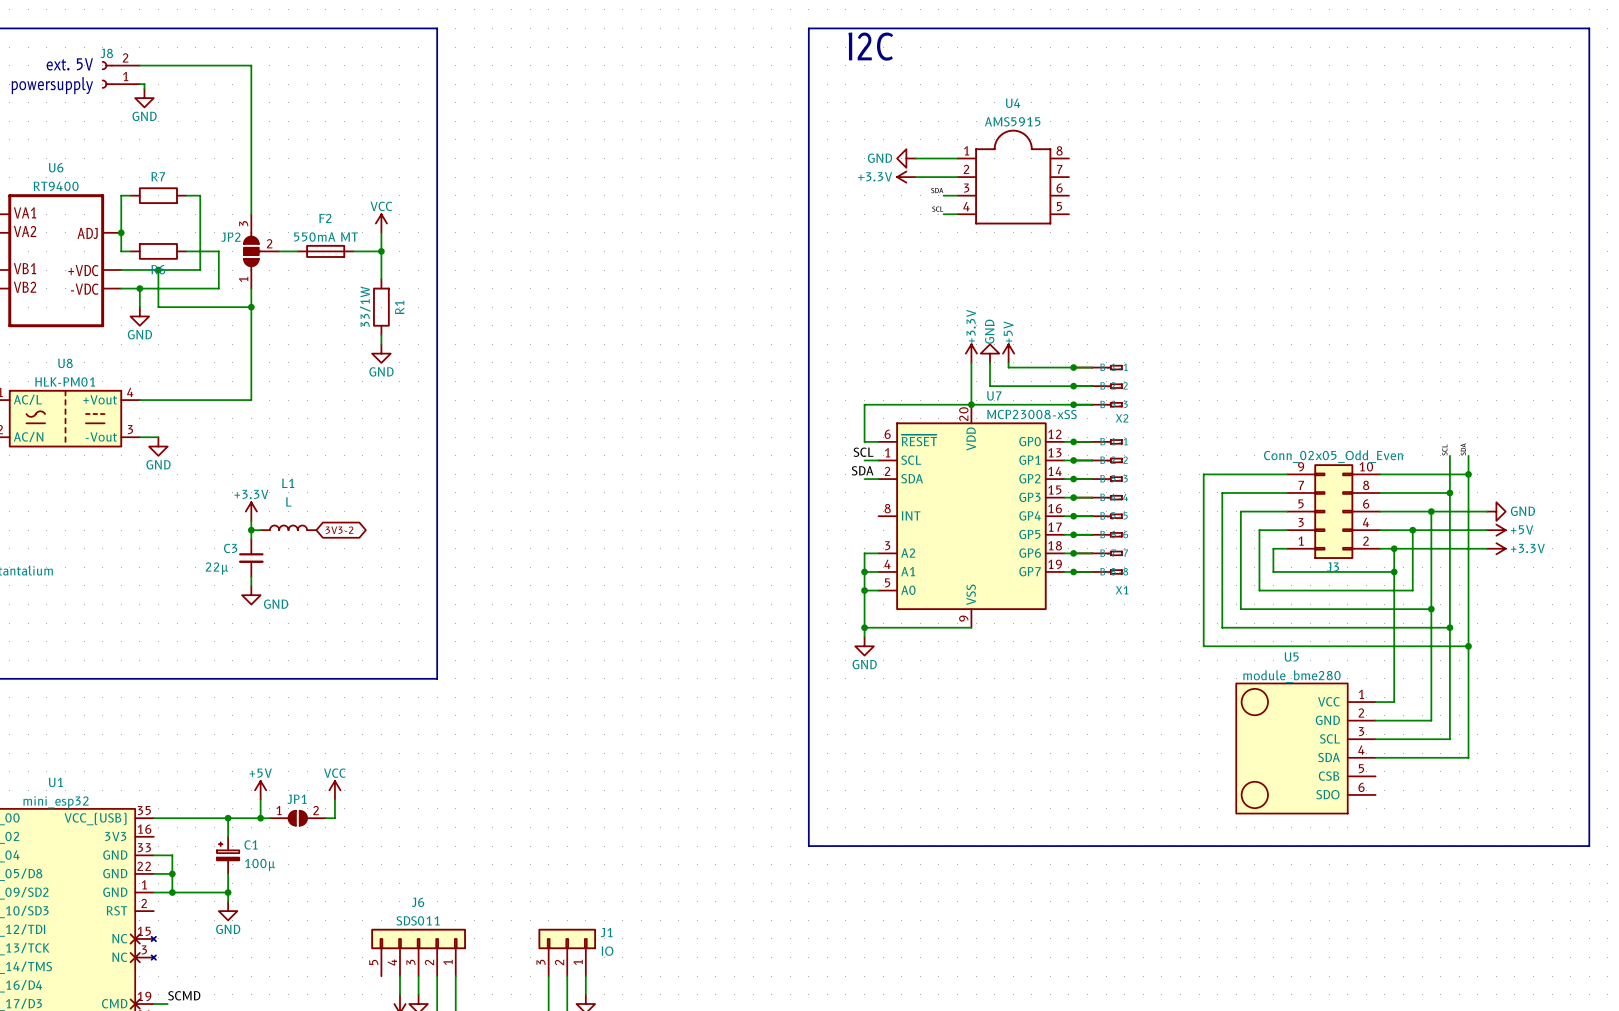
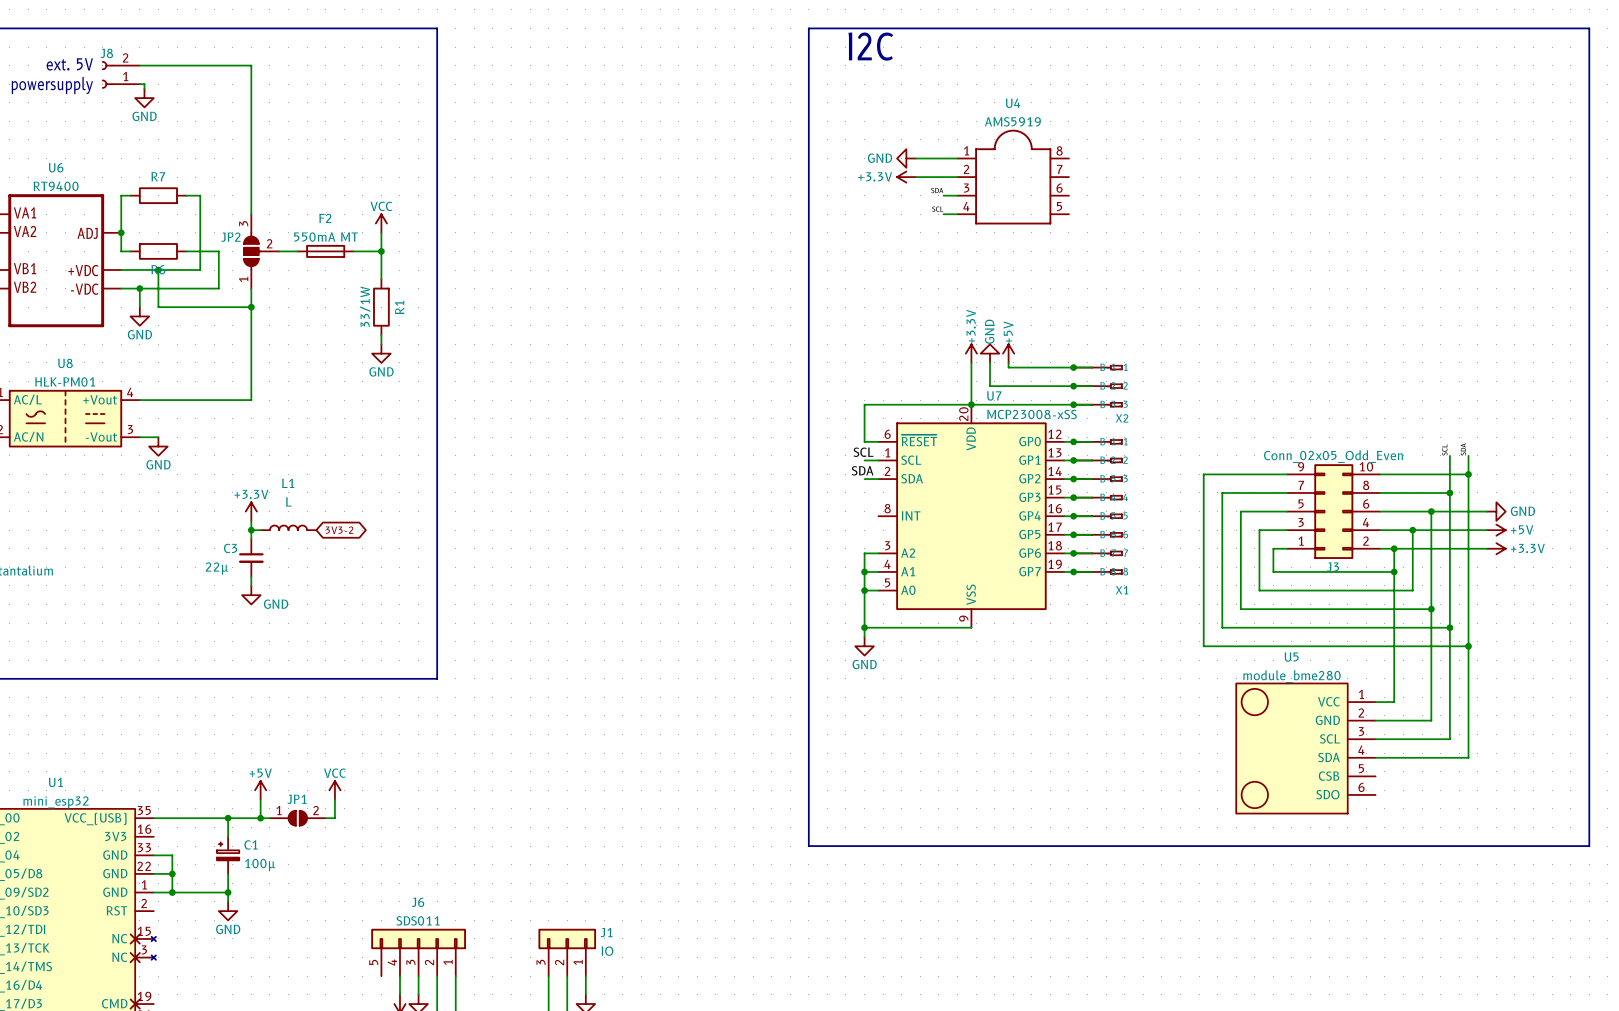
U4 value: AMS5915 (1012, 121) -> AMS5919 (1012, 121)
label: SCMD (184, 995) -> none
wire: (153, 1004) (167, 1004) -> none

